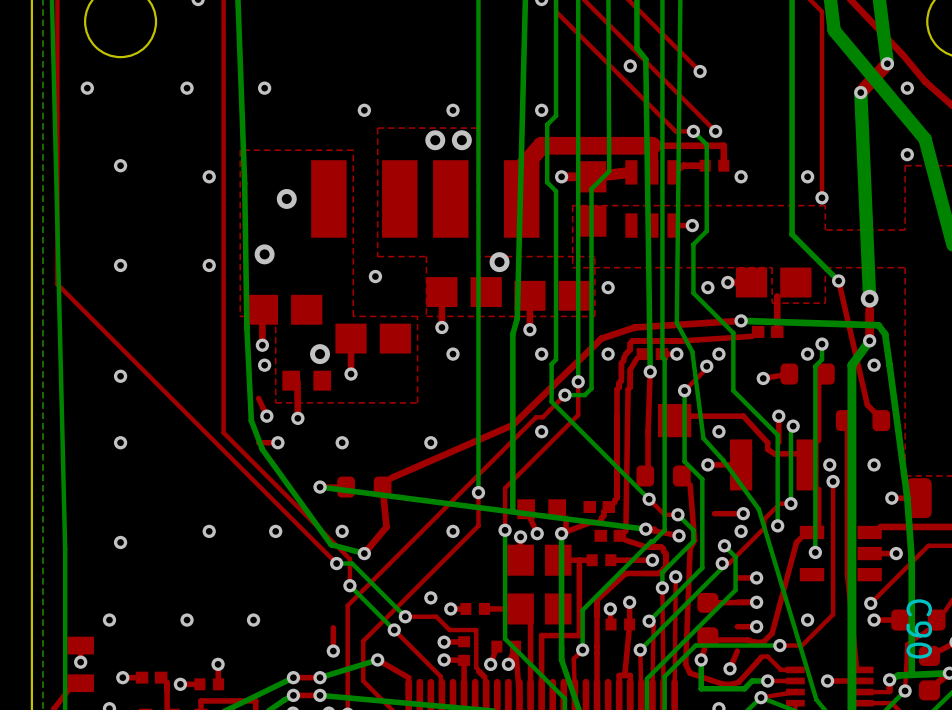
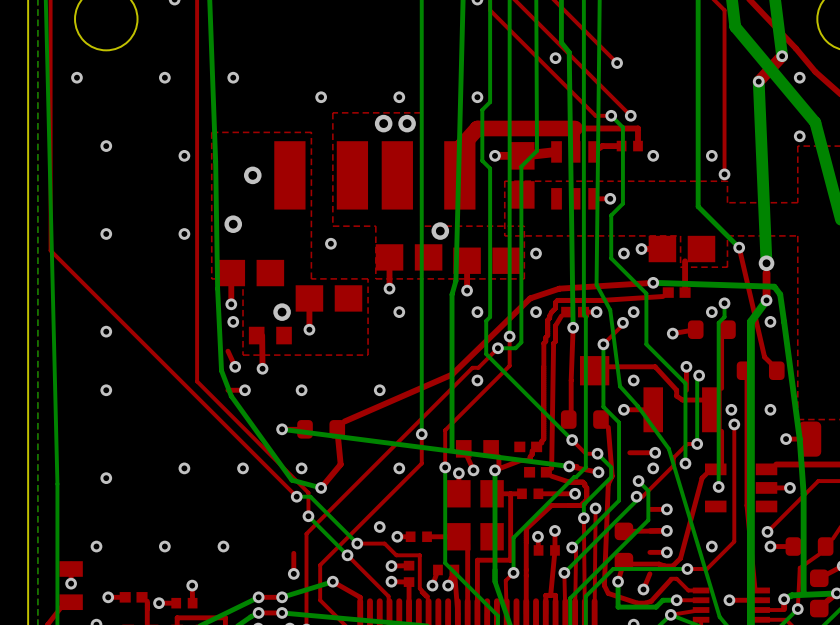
C90 name: C90 (919, 628) -> none

